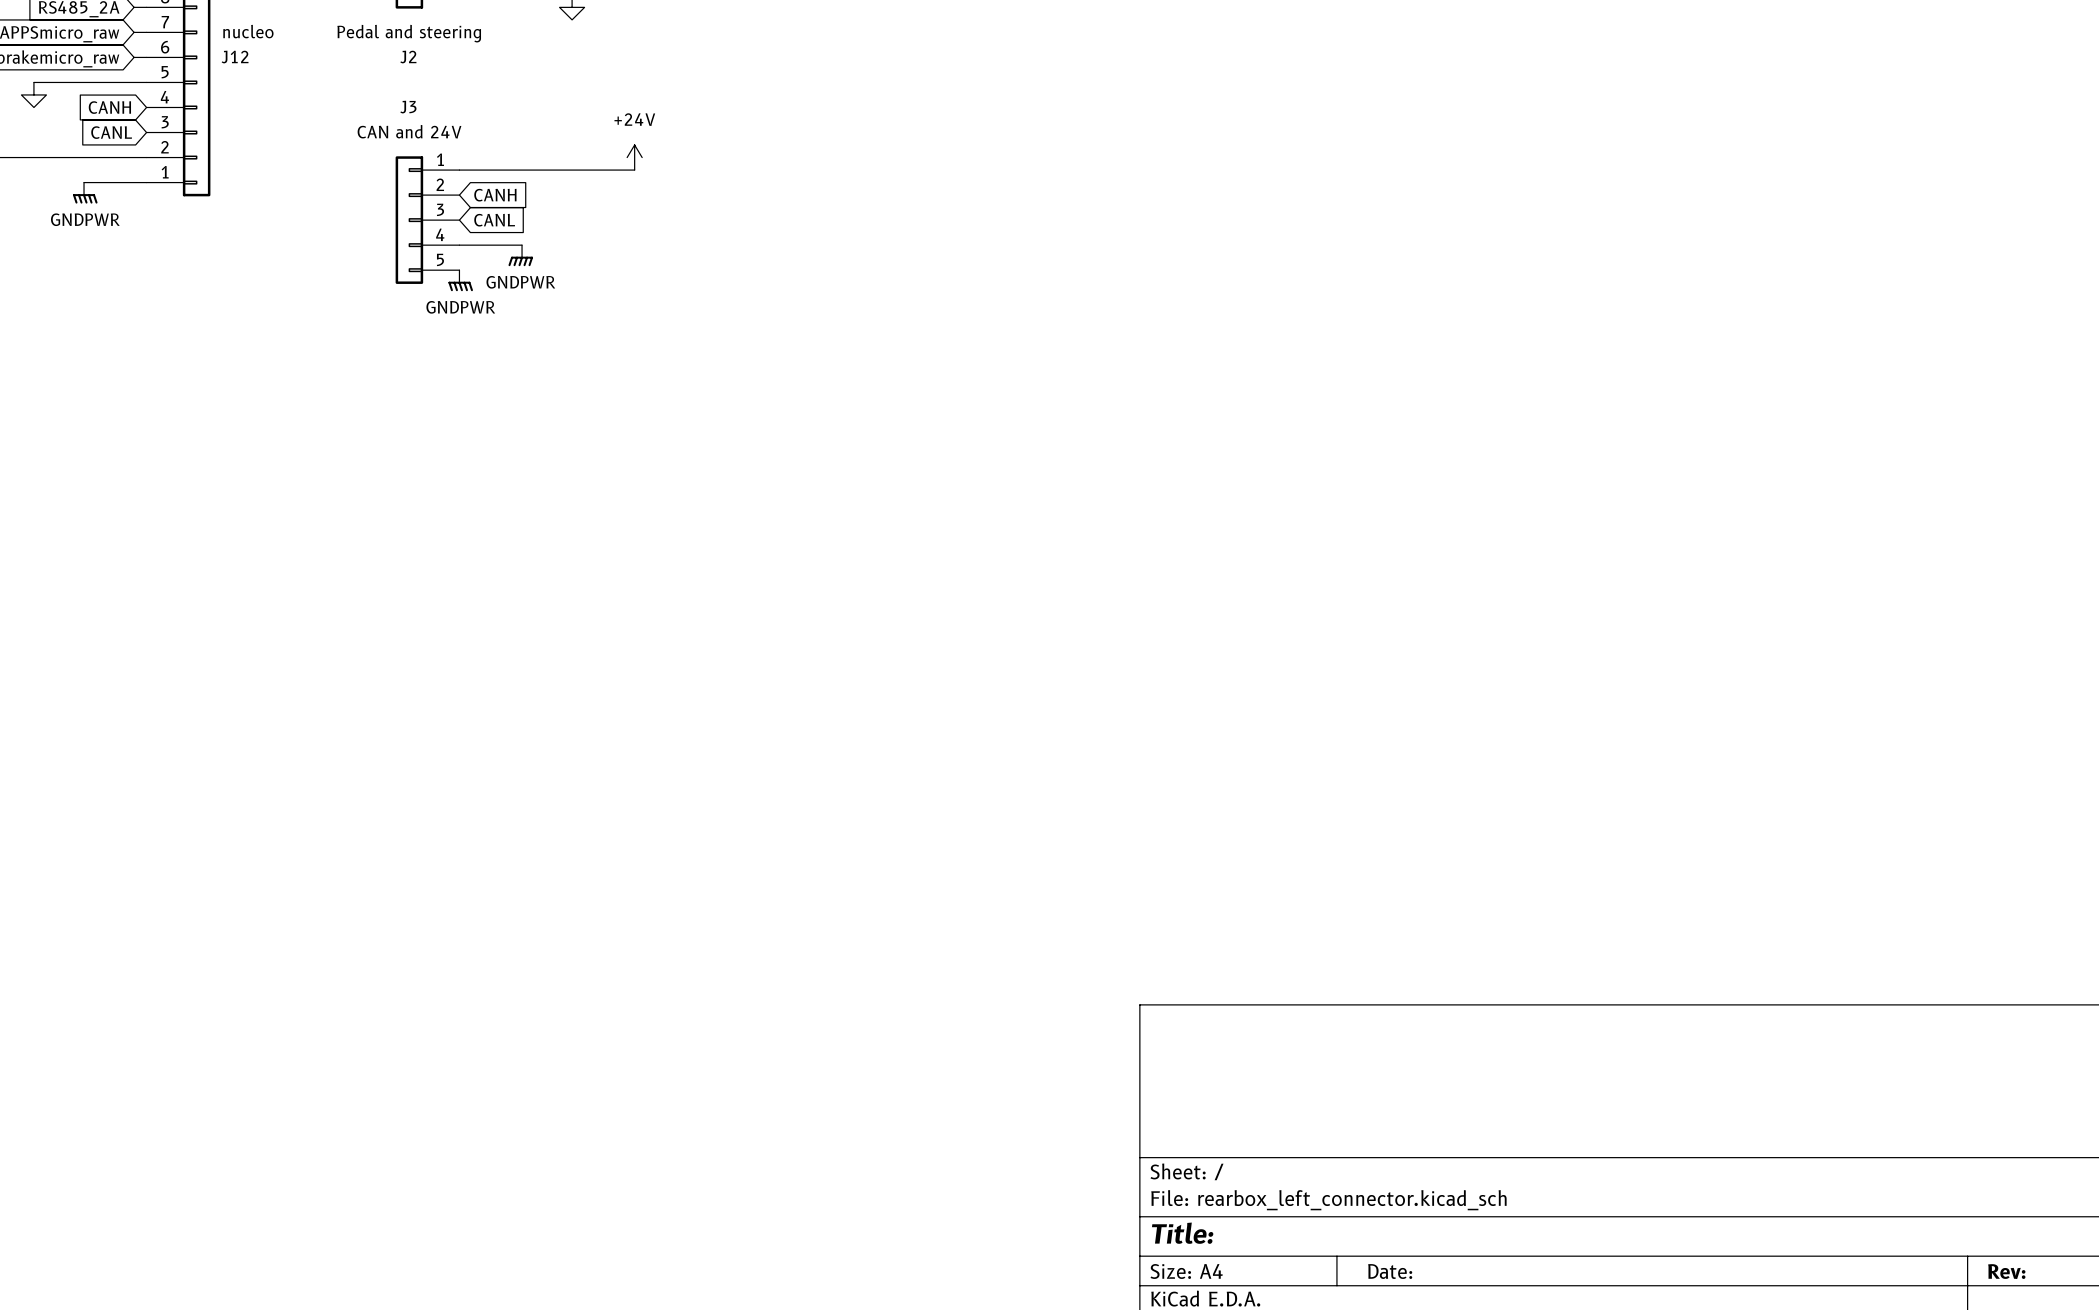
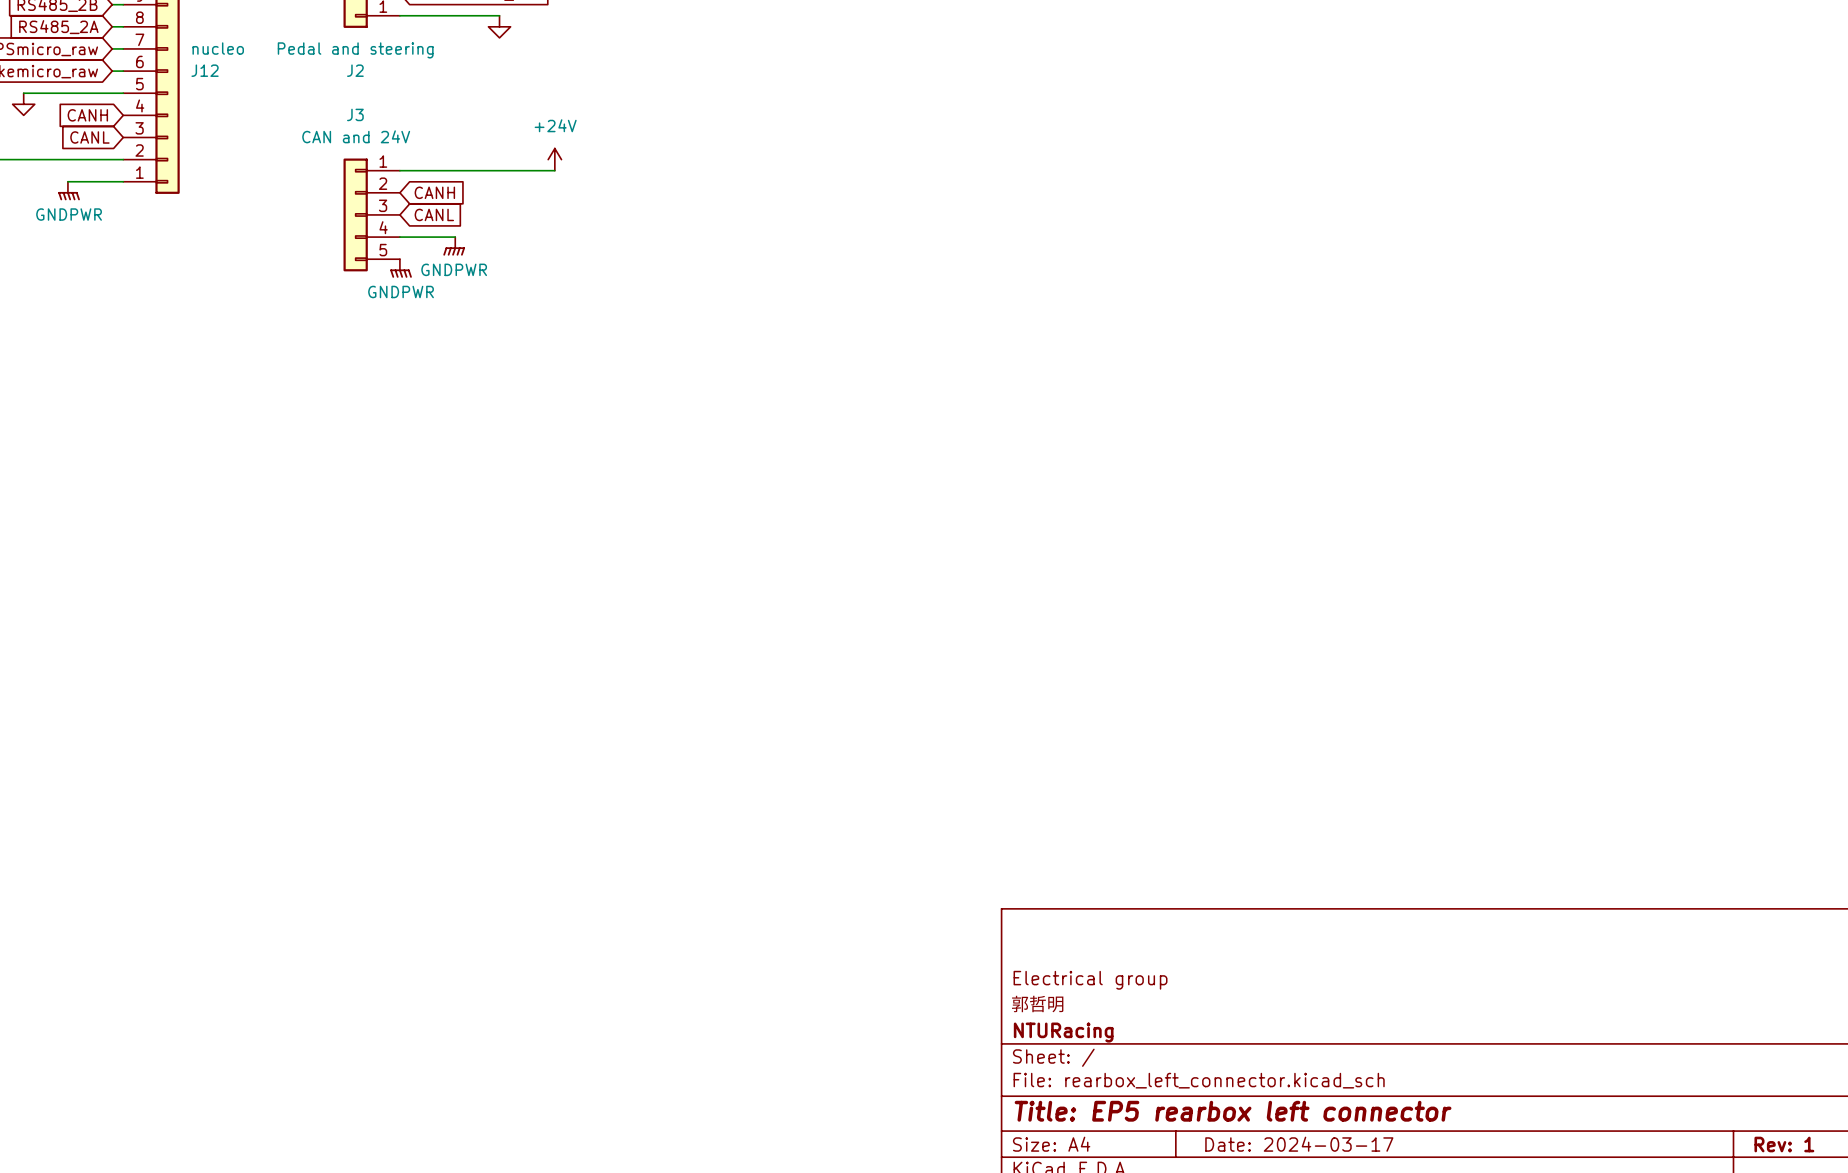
title block: none -> Electrical group (1090, 980)
title block: none -> 郭哲明 (1037, 1004)
title block: none -> NTURacing (1063, 1032)
title block: Title: (1182, 1233) -> Title: EP5 rearbox left connector (1233, 1111)
title block: Date: (1390, 1271) -> Date: 2024-03-17 (1299, 1144)
title block: Rev: (2006, 1271) -> Rev: 1 (1784, 1144)

